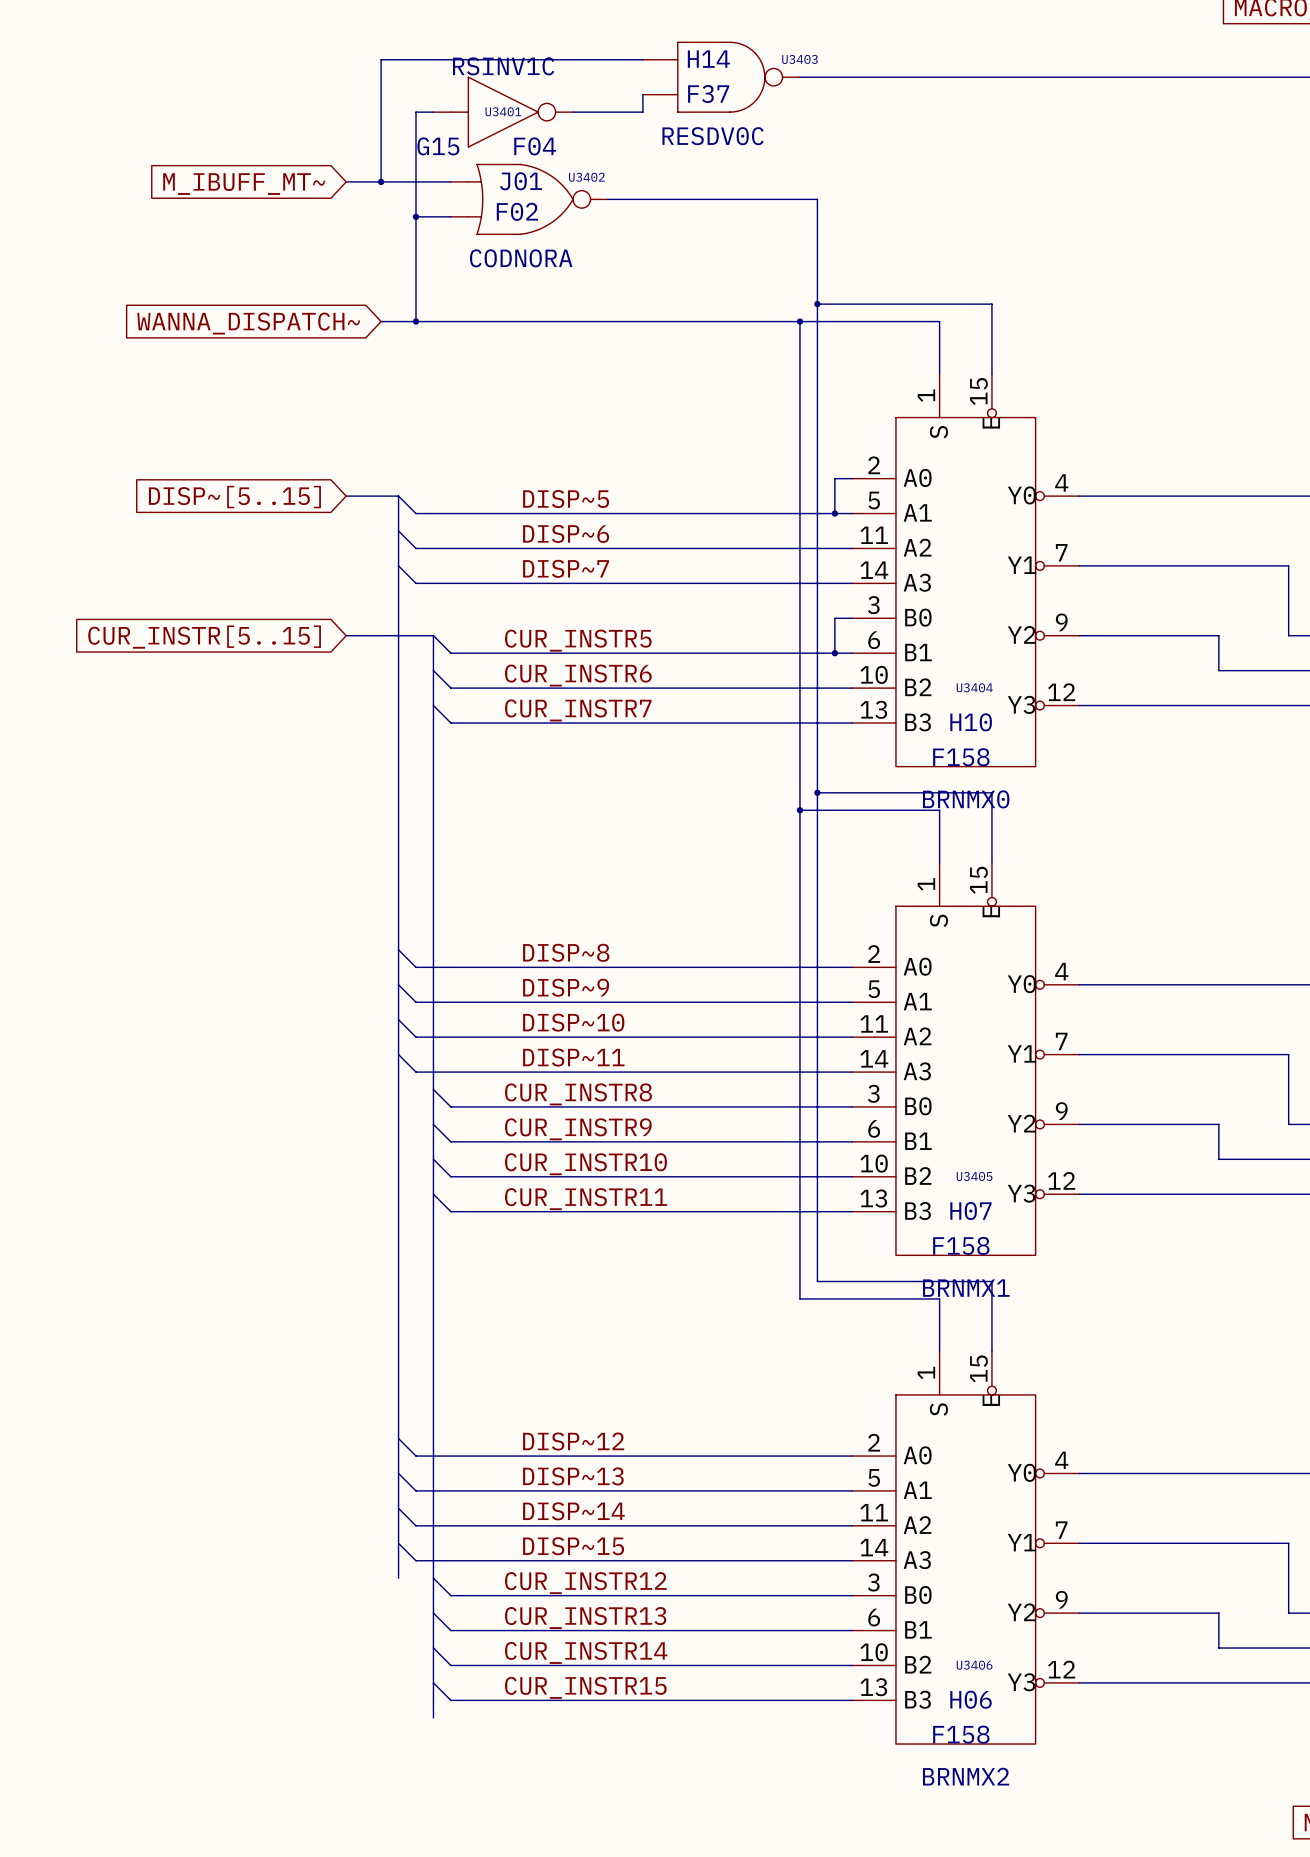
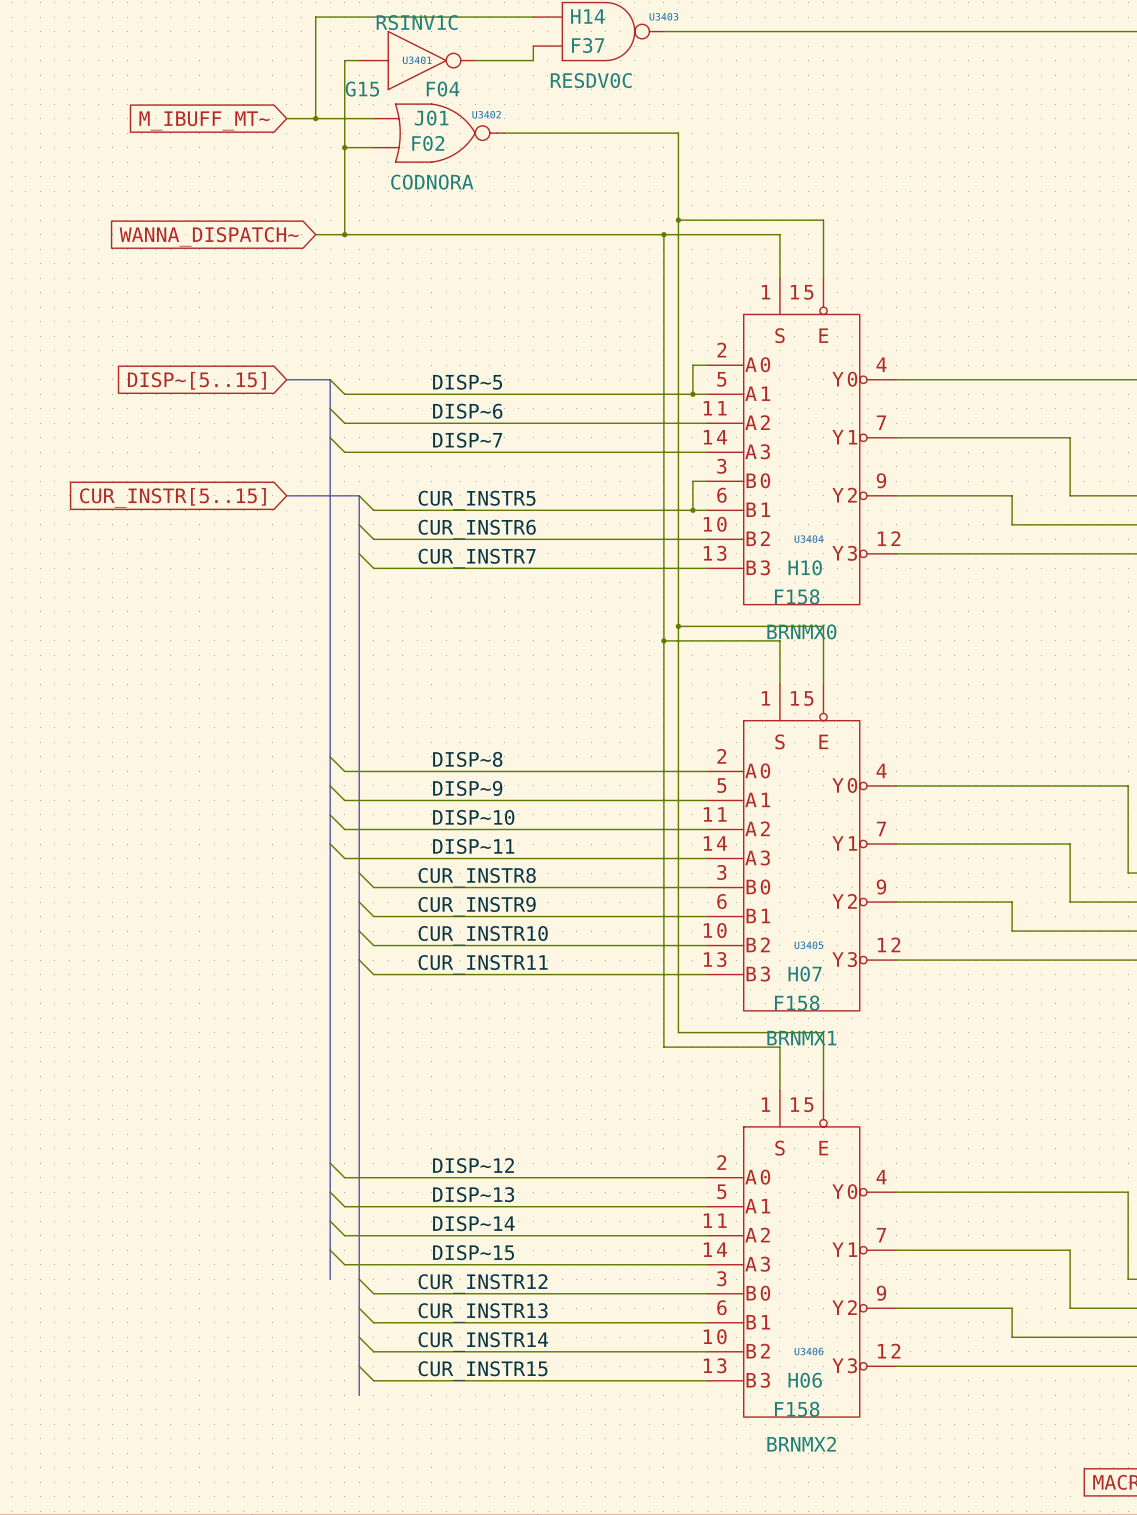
U3404 symbol: [852, 373, 1080, 767] -> [707, 278, 897, 605]
U3405 symbol: [852, 862, 1080, 1256] -> [707, 684, 897, 1011]
U3406 symbol: [852, 1351, 1080, 1745] -> [707, 1090, 897, 1418]

